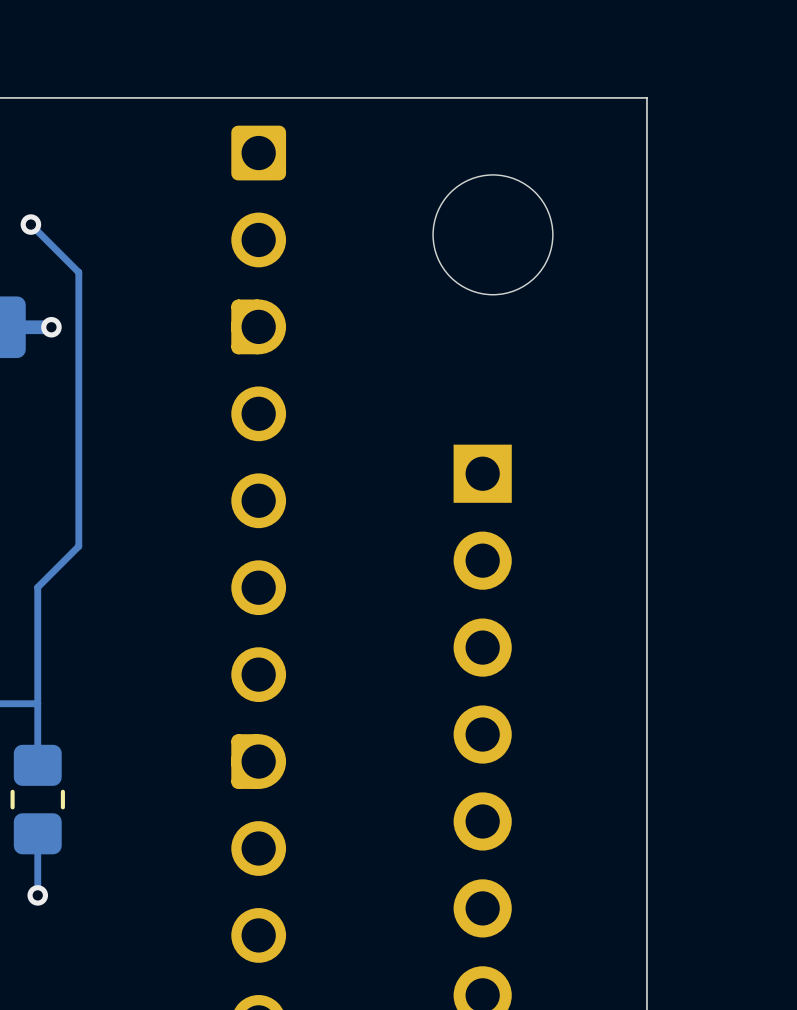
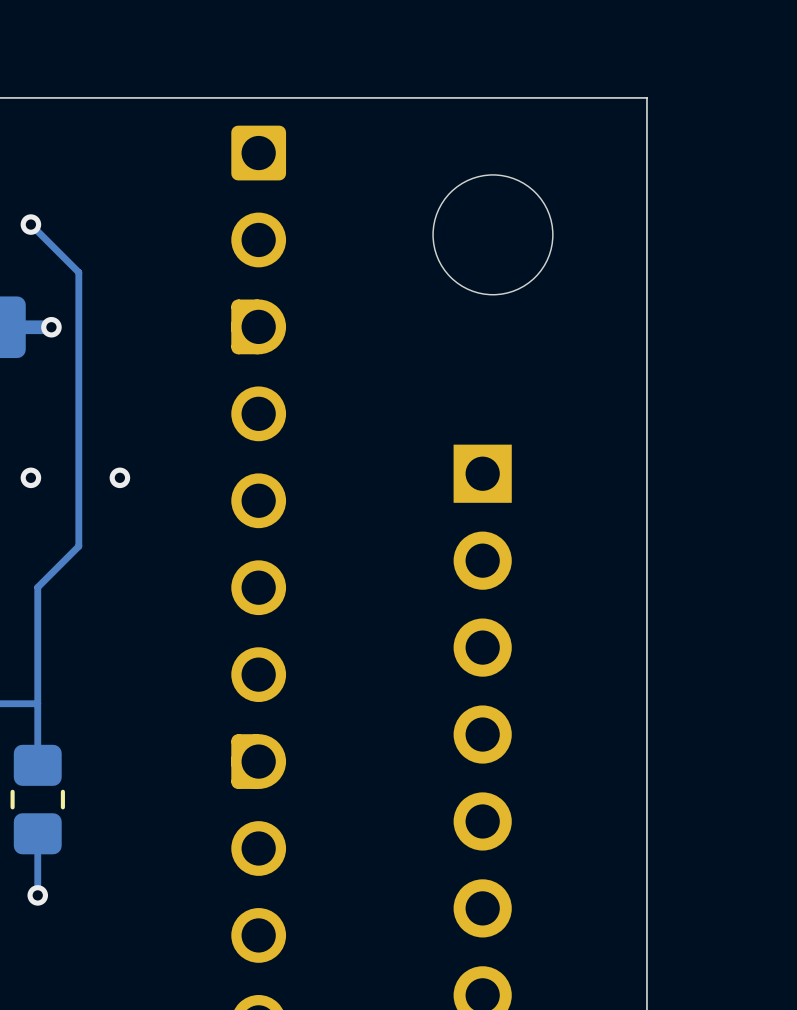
via: none -> (30, 477)
via: none -> (119, 477)

